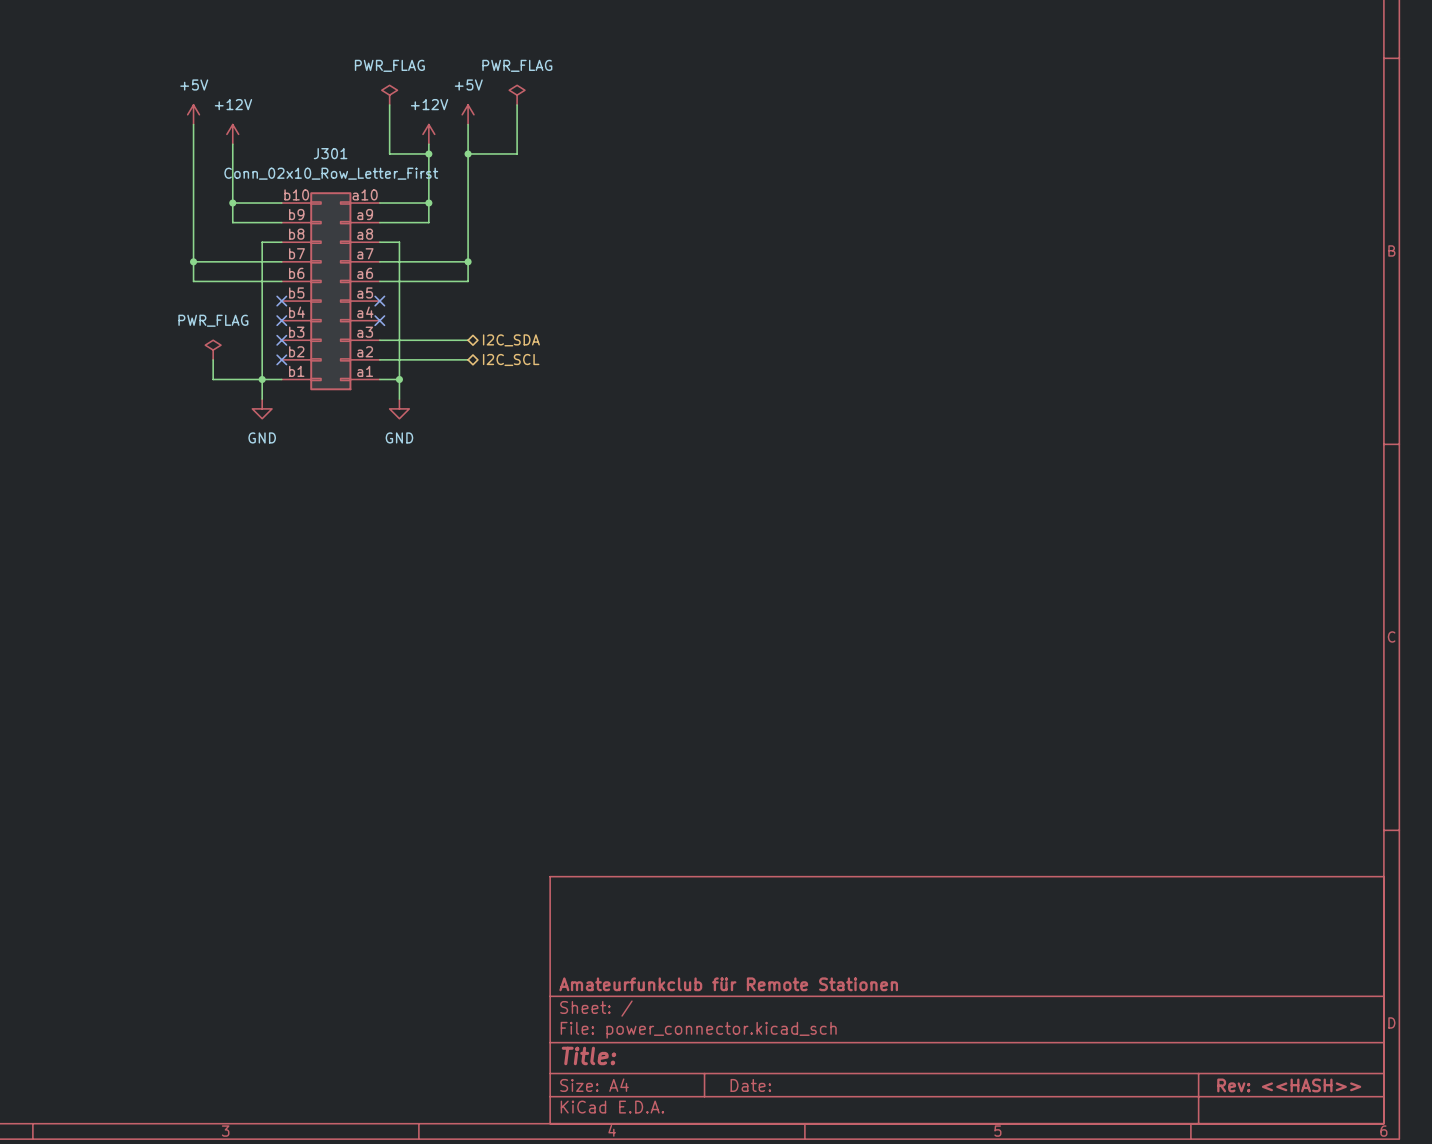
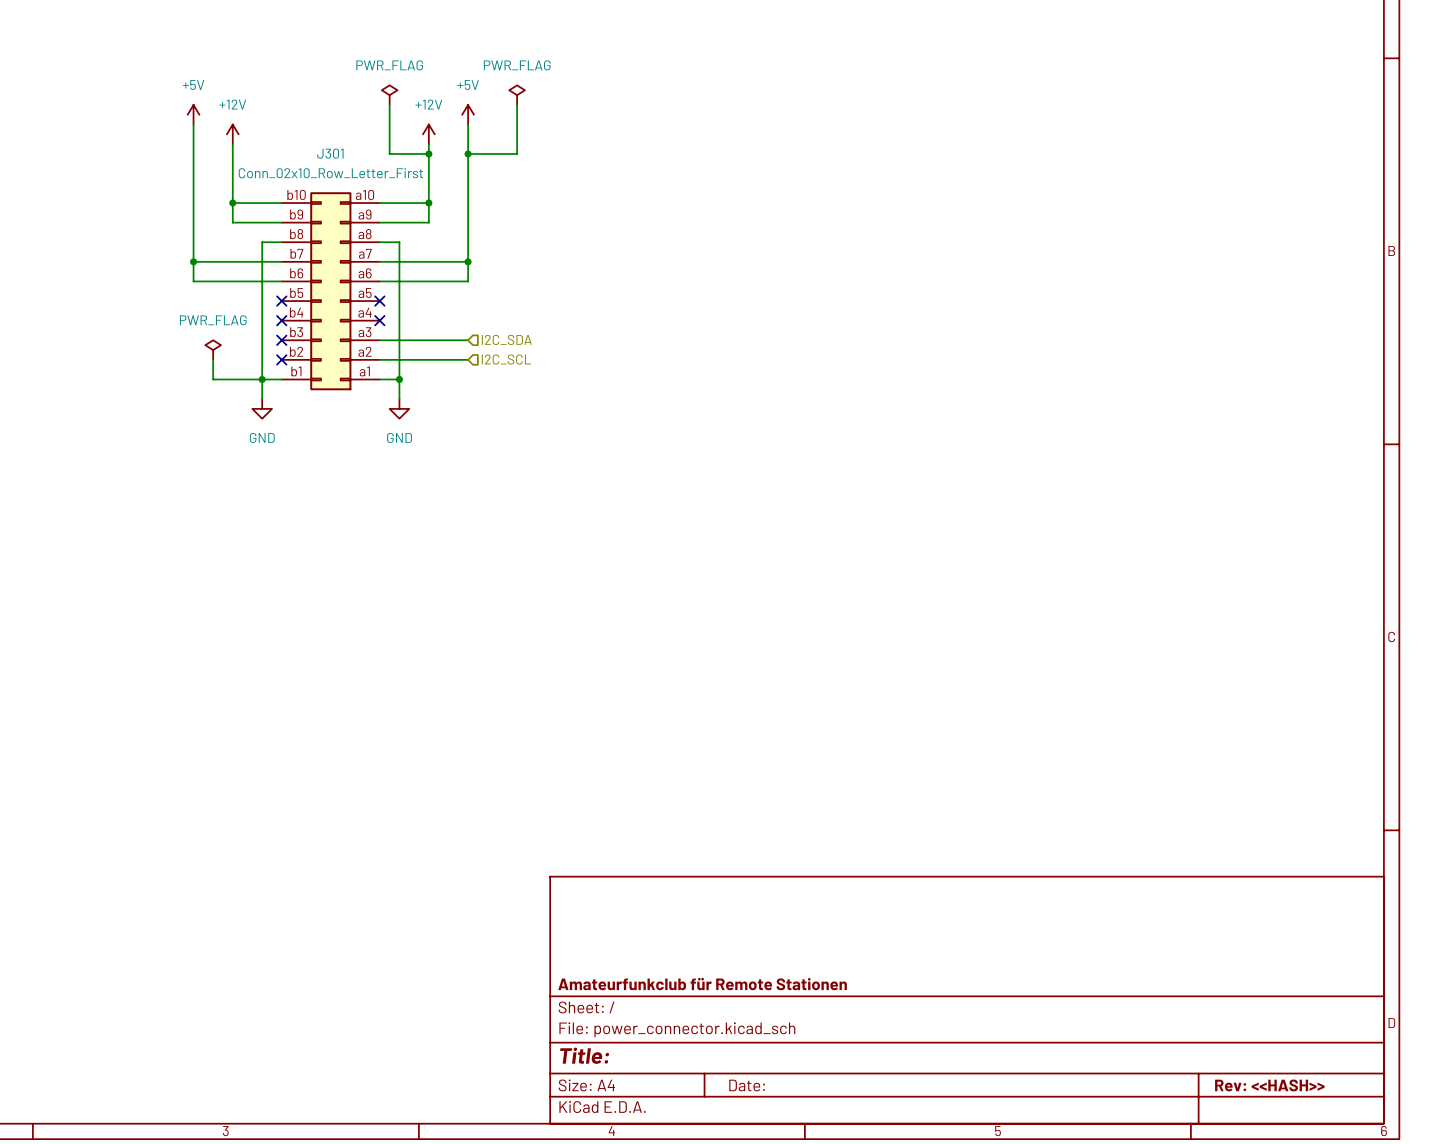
hierarchical label shape: bidirectional (511, 340) -> input (506, 339)
hierarchical label shape: bidirectional (511, 359) -> input (506, 359)

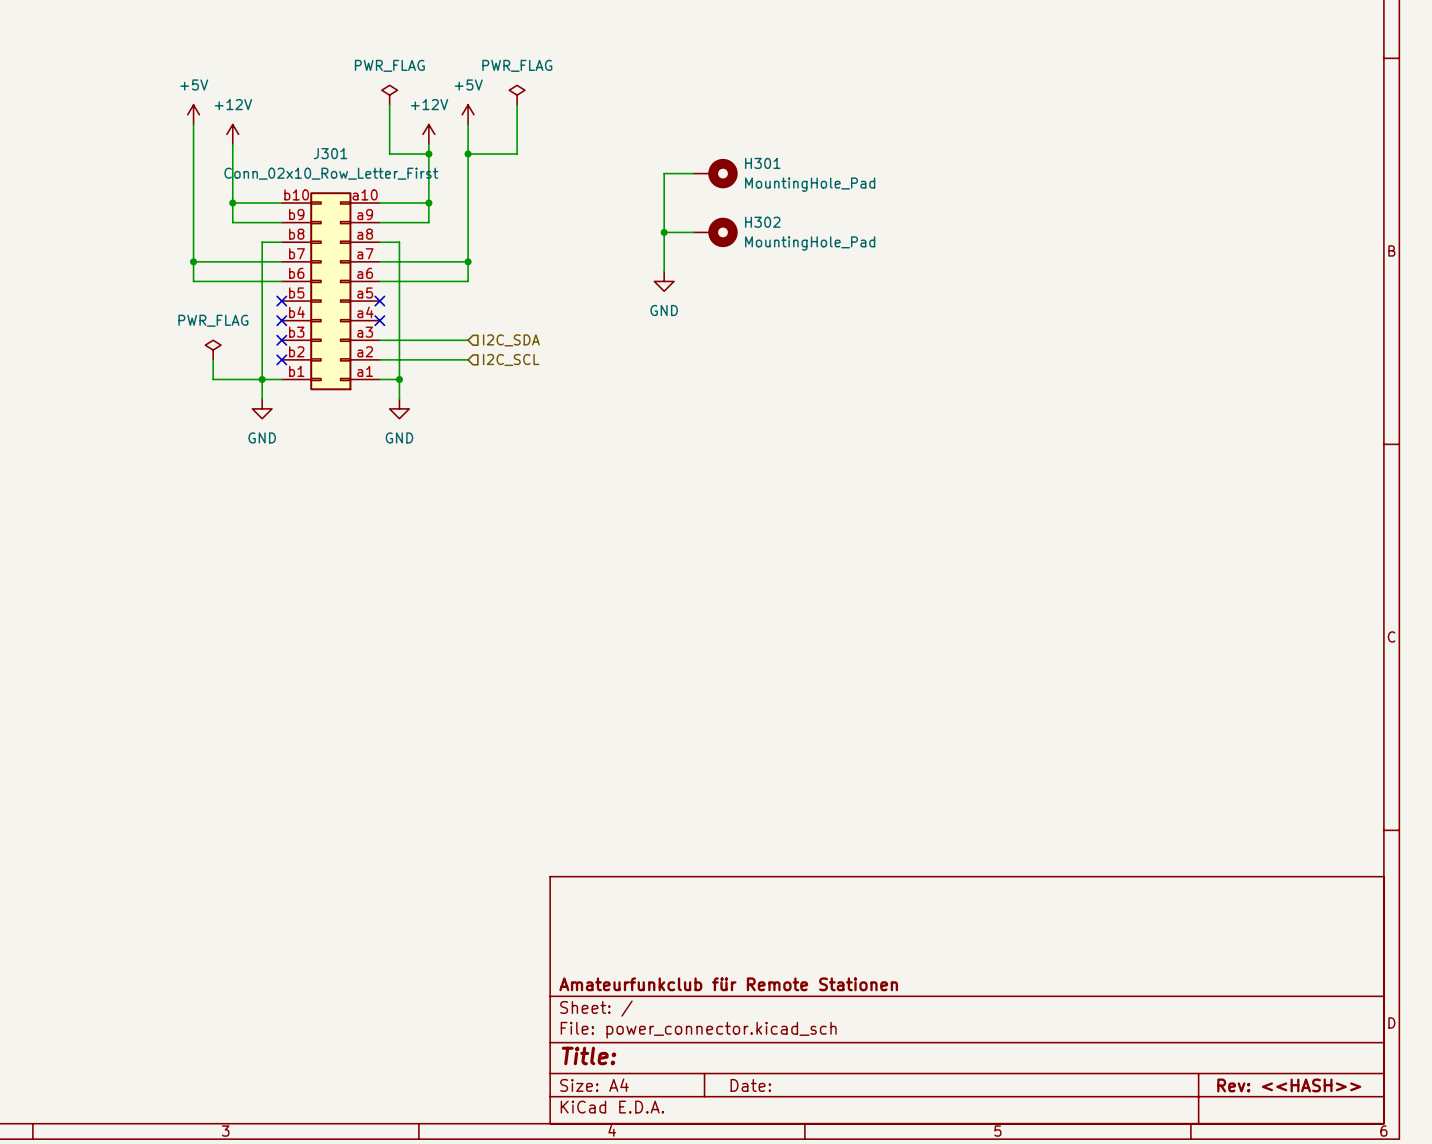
wire: none -> (693, 173) (664, 173) (664, 271)
H301: none -> MountingHole_Pad (715, 173)
wire: none -> (664, 232) (693, 232)
junction: none -> (664, 232)
H302: none -> MountingHole_Pad (715, 232)
power symbol: none -> GND (664, 281)

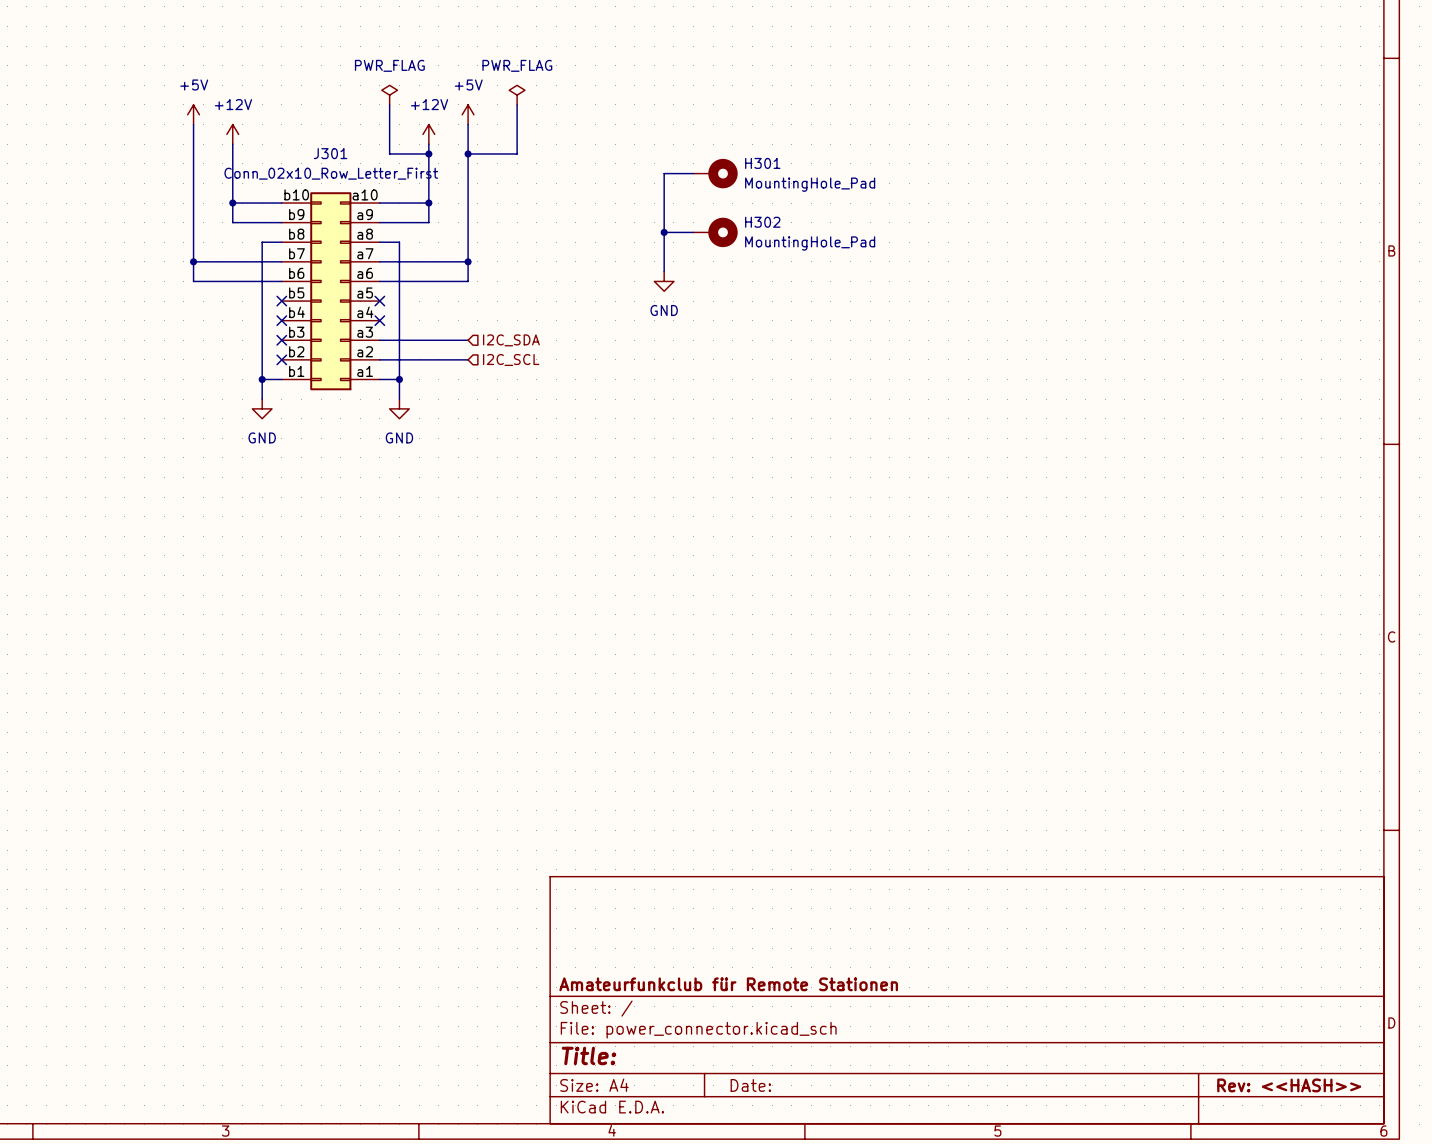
power symbol: PWR_FLAG (213, 350) -> none
wire: (213, 359) (213, 379) (262, 379) -> none

